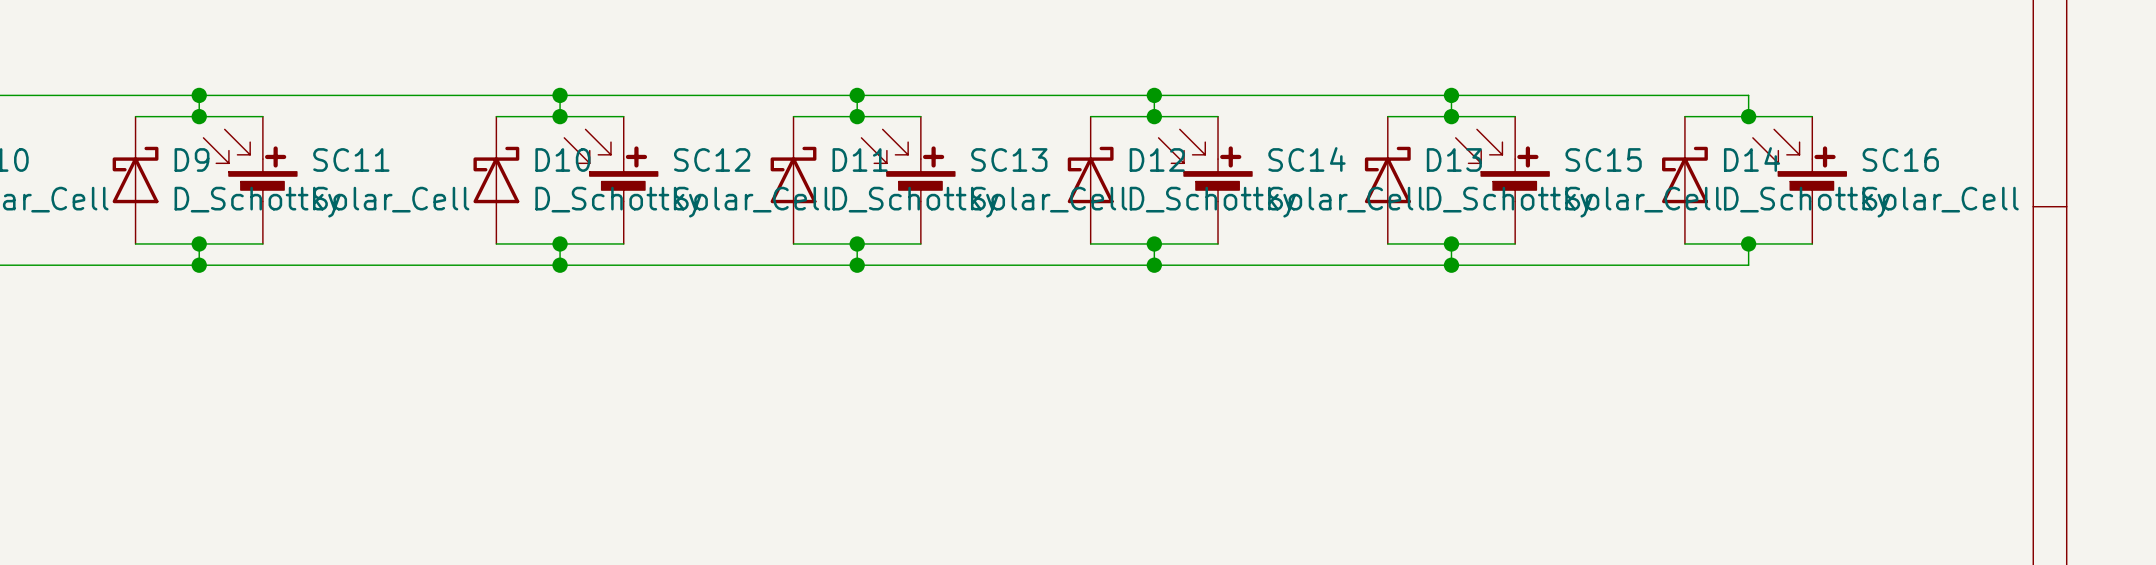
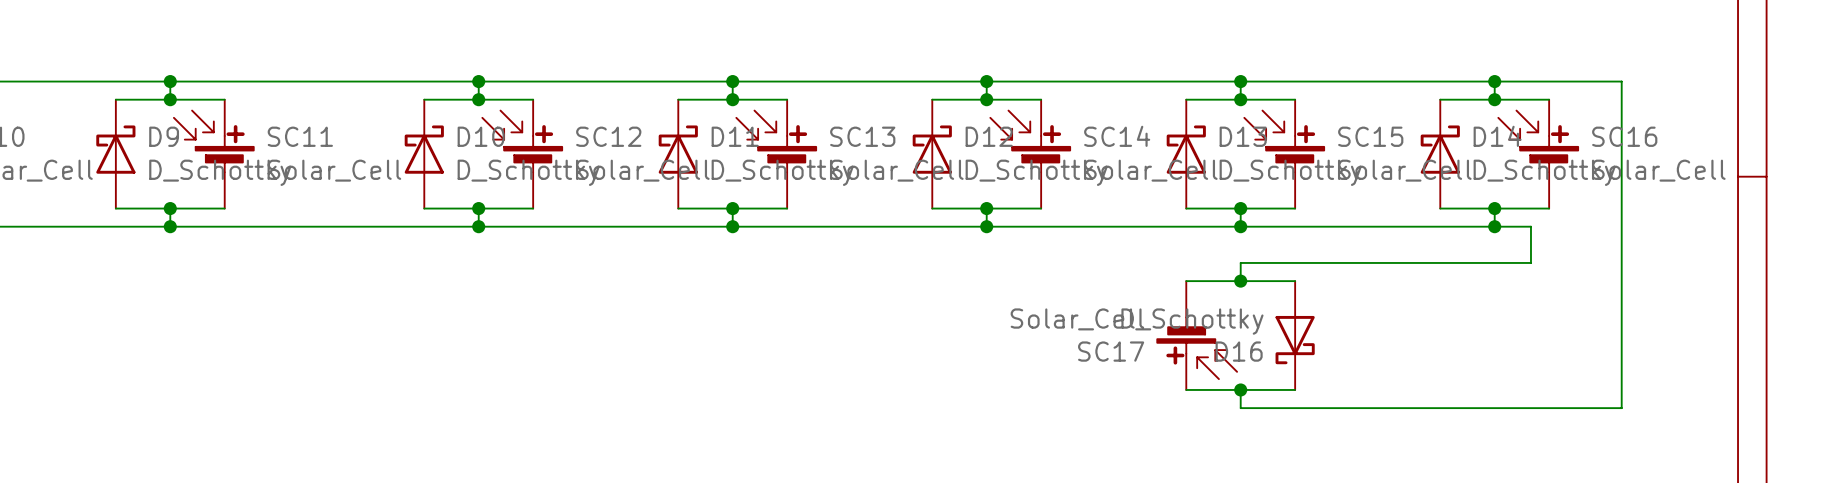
wire: none -> (1494, 81) (1621, 81) (1621, 408) (1240, 408) (1240, 389)
junction: none -> (1494, 81)
wire: none -> (1494, 226) (1530, 226) (1530, 262) (1240, 262) (1240, 281)
junction: none -> (1494, 226)
wire: none -> (1186, 281) (1295, 281)
junction: none -> (1240, 281)
SC17: none -> Solar_Cell (1197, 335)
D16: none -> D_Schottky (1295, 335)
wire: none -> (1186, 389) (1295, 389)
junction: none -> (1240, 389)

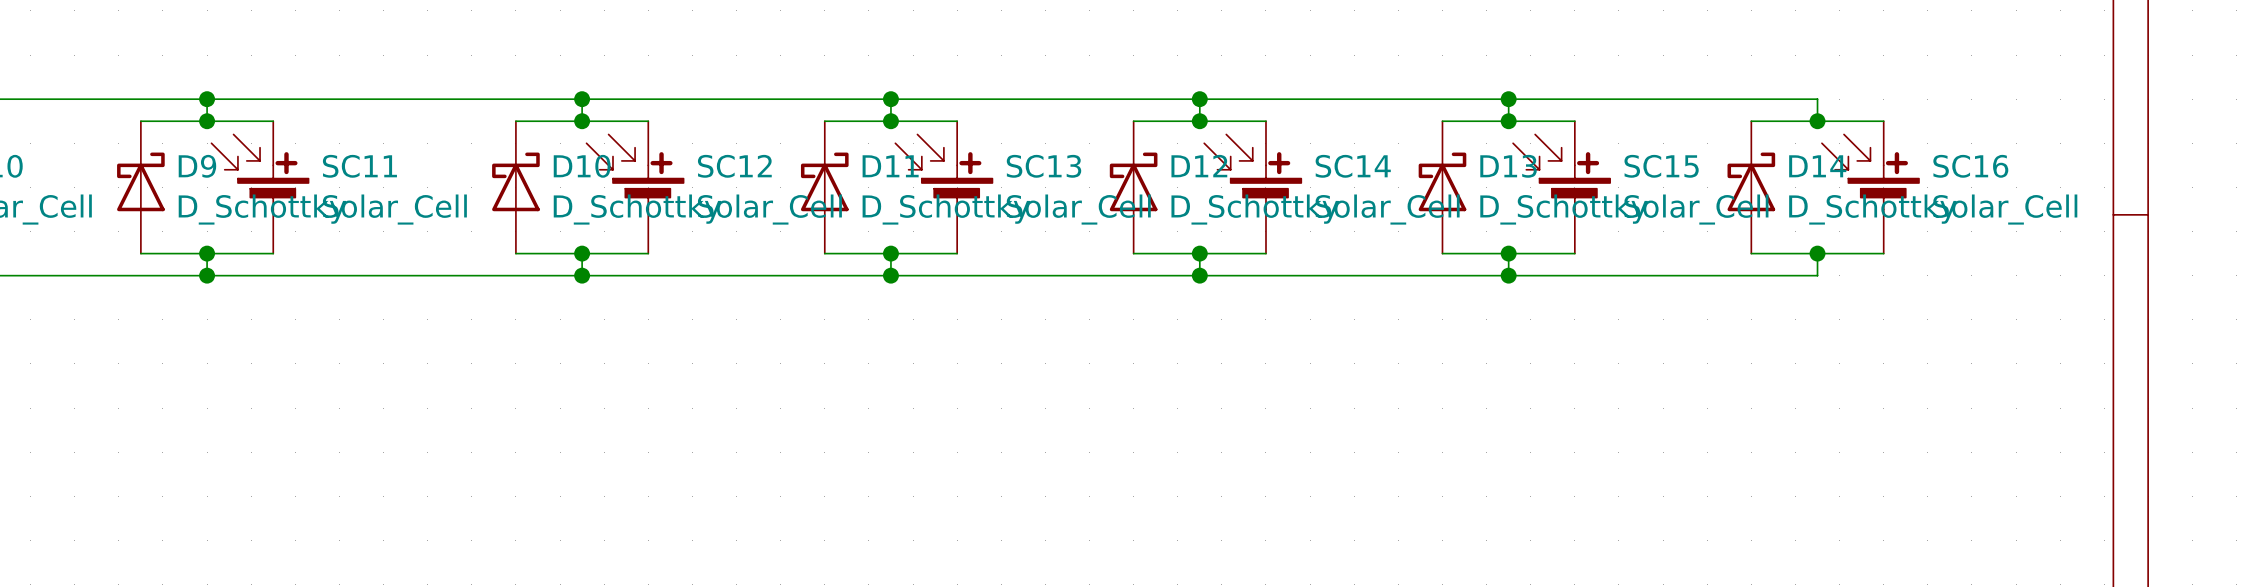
wire: (1494, 81) (1621, 81) (1621, 408) (1240, 408) (1240, 389) -> none
junction: (1494, 81) -> none
wire: (1494, 226) (1530, 226) (1530, 262) (1240, 262) (1240, 281) -> none
junction: (1494, 226) -> none
wire: (1186, 281) (1295, 281) -> none
junction: (1240, 281) -> none
SC17: Solar_Cell (1197, 335) -> none
D16: D_Schottky (1295, 335) -> none
wire: (1186, 389) (1295, 389) -> none
junction: (1240, 389) -> none

